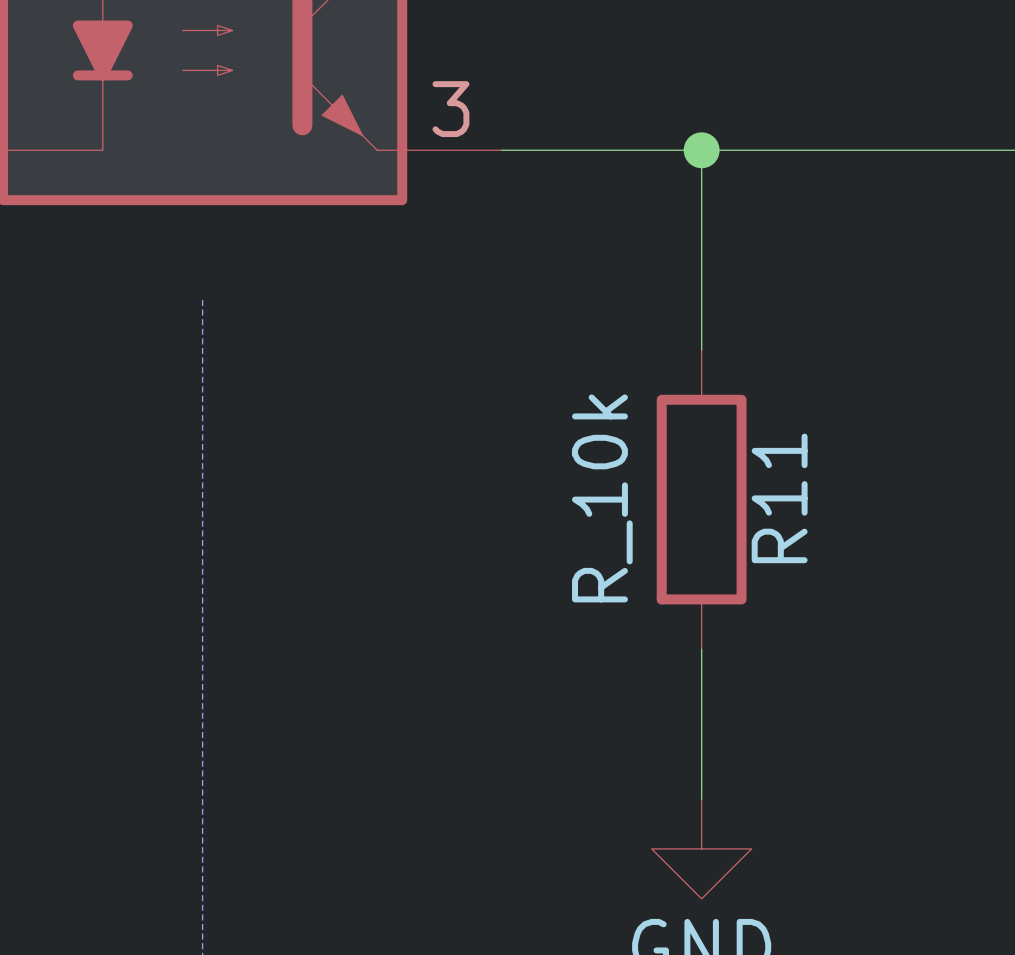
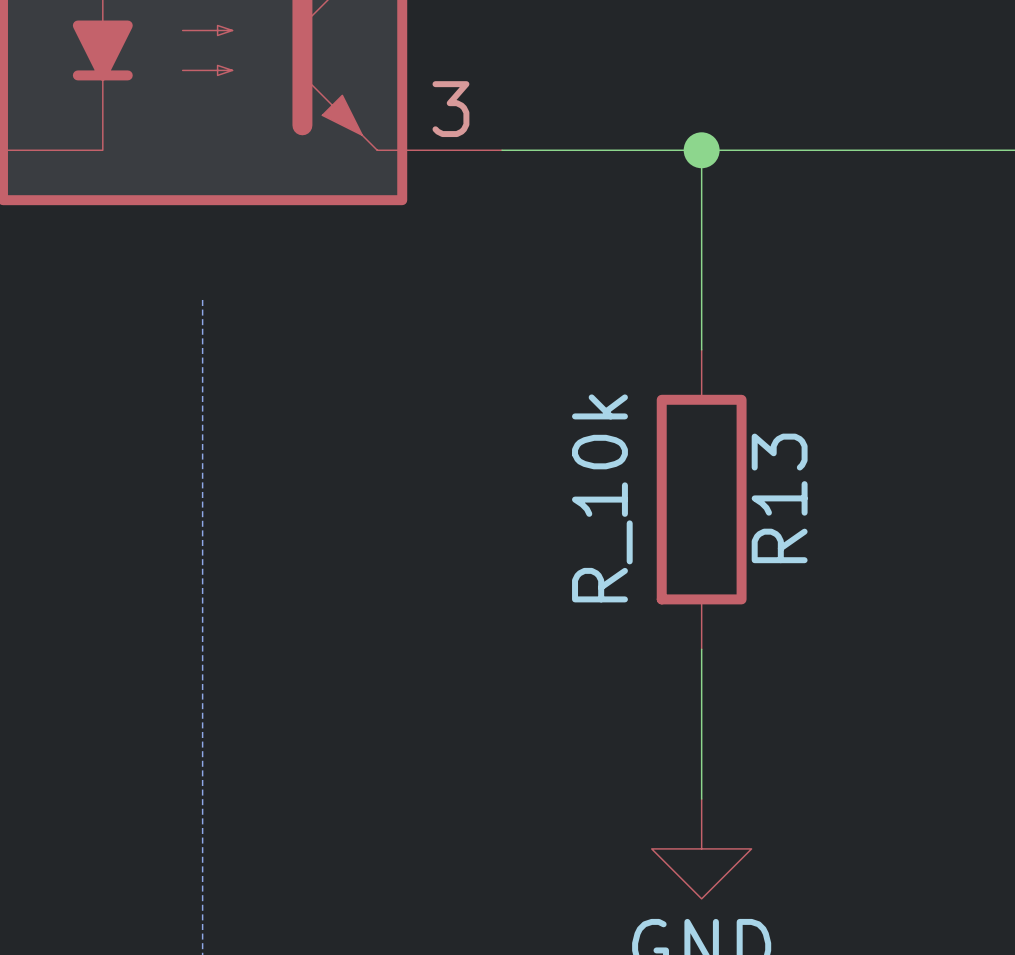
R11 name: R11 (779, 498) -> R13 (779, 498)

